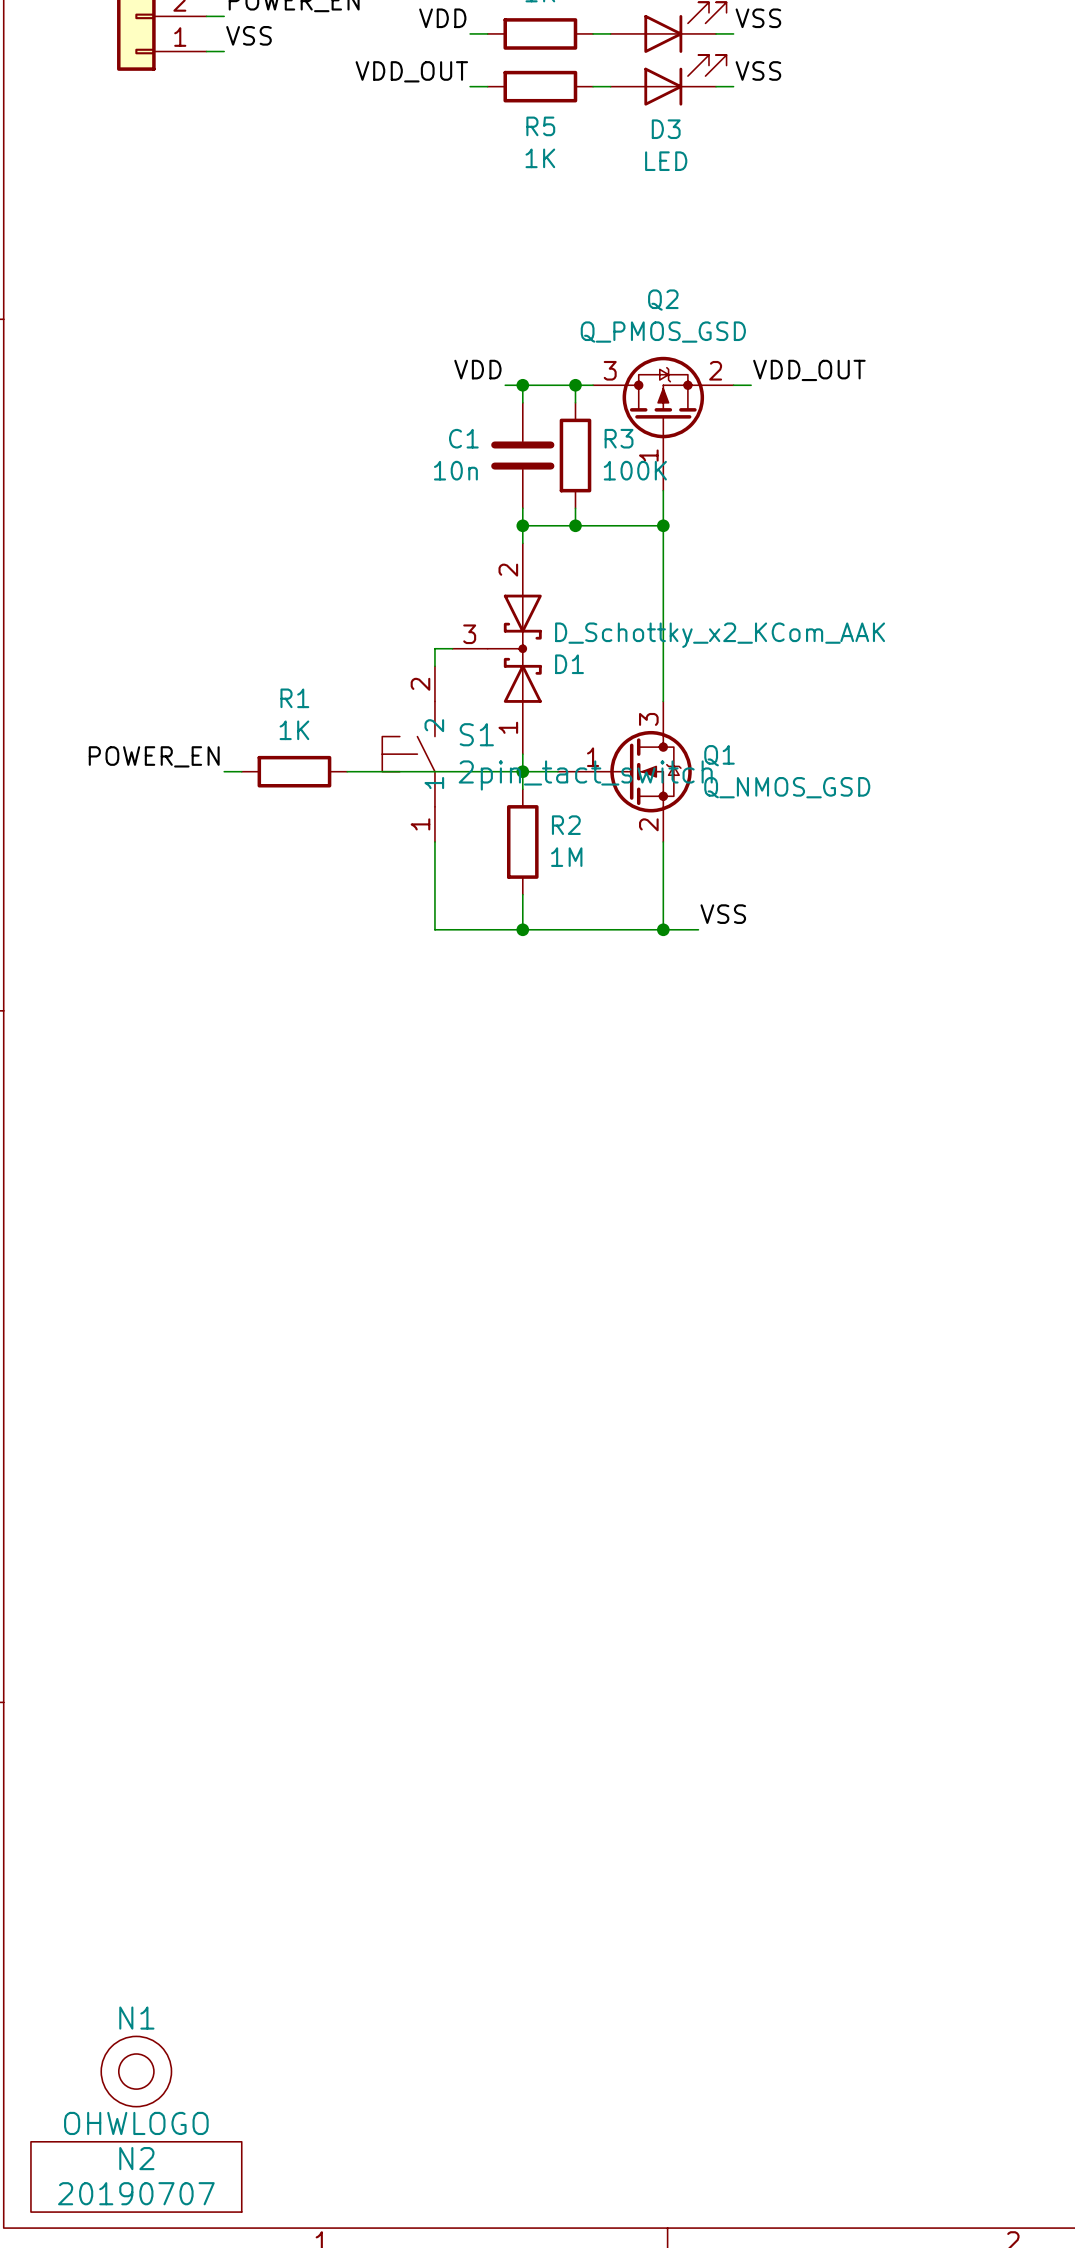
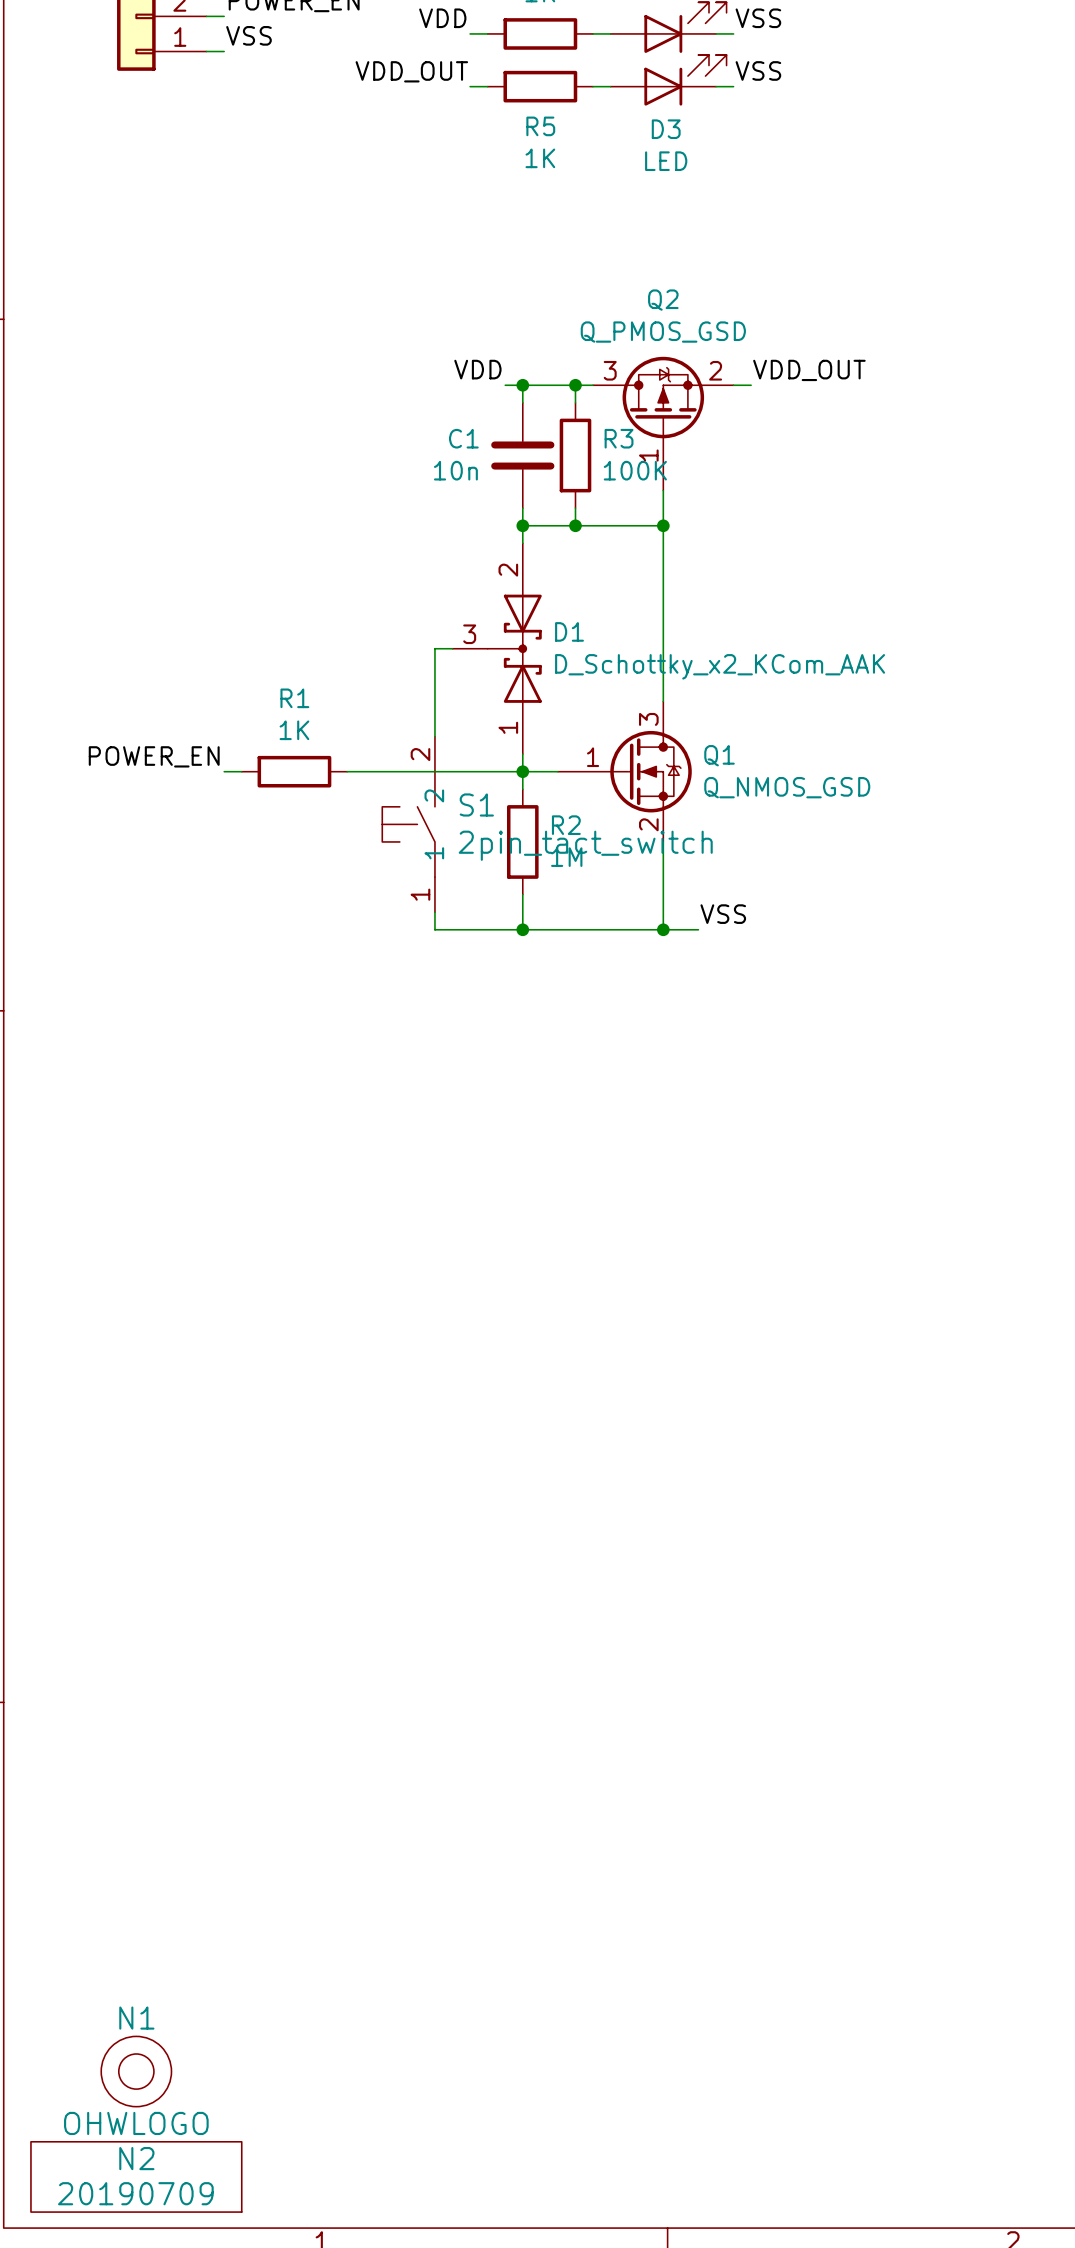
D1 value position: D_Schottky_x2_KCom_AAK (720, 635) -> D_Schottky_x2_KCom_AAK (720, 666)
D1 name position: D1 (569, 664) -> D1 (569, 631)
S1 position: (408, 754) -> (408, 824)
N2 value: 20190707 (136, 2193) -> 20190709 (135, 2193)

